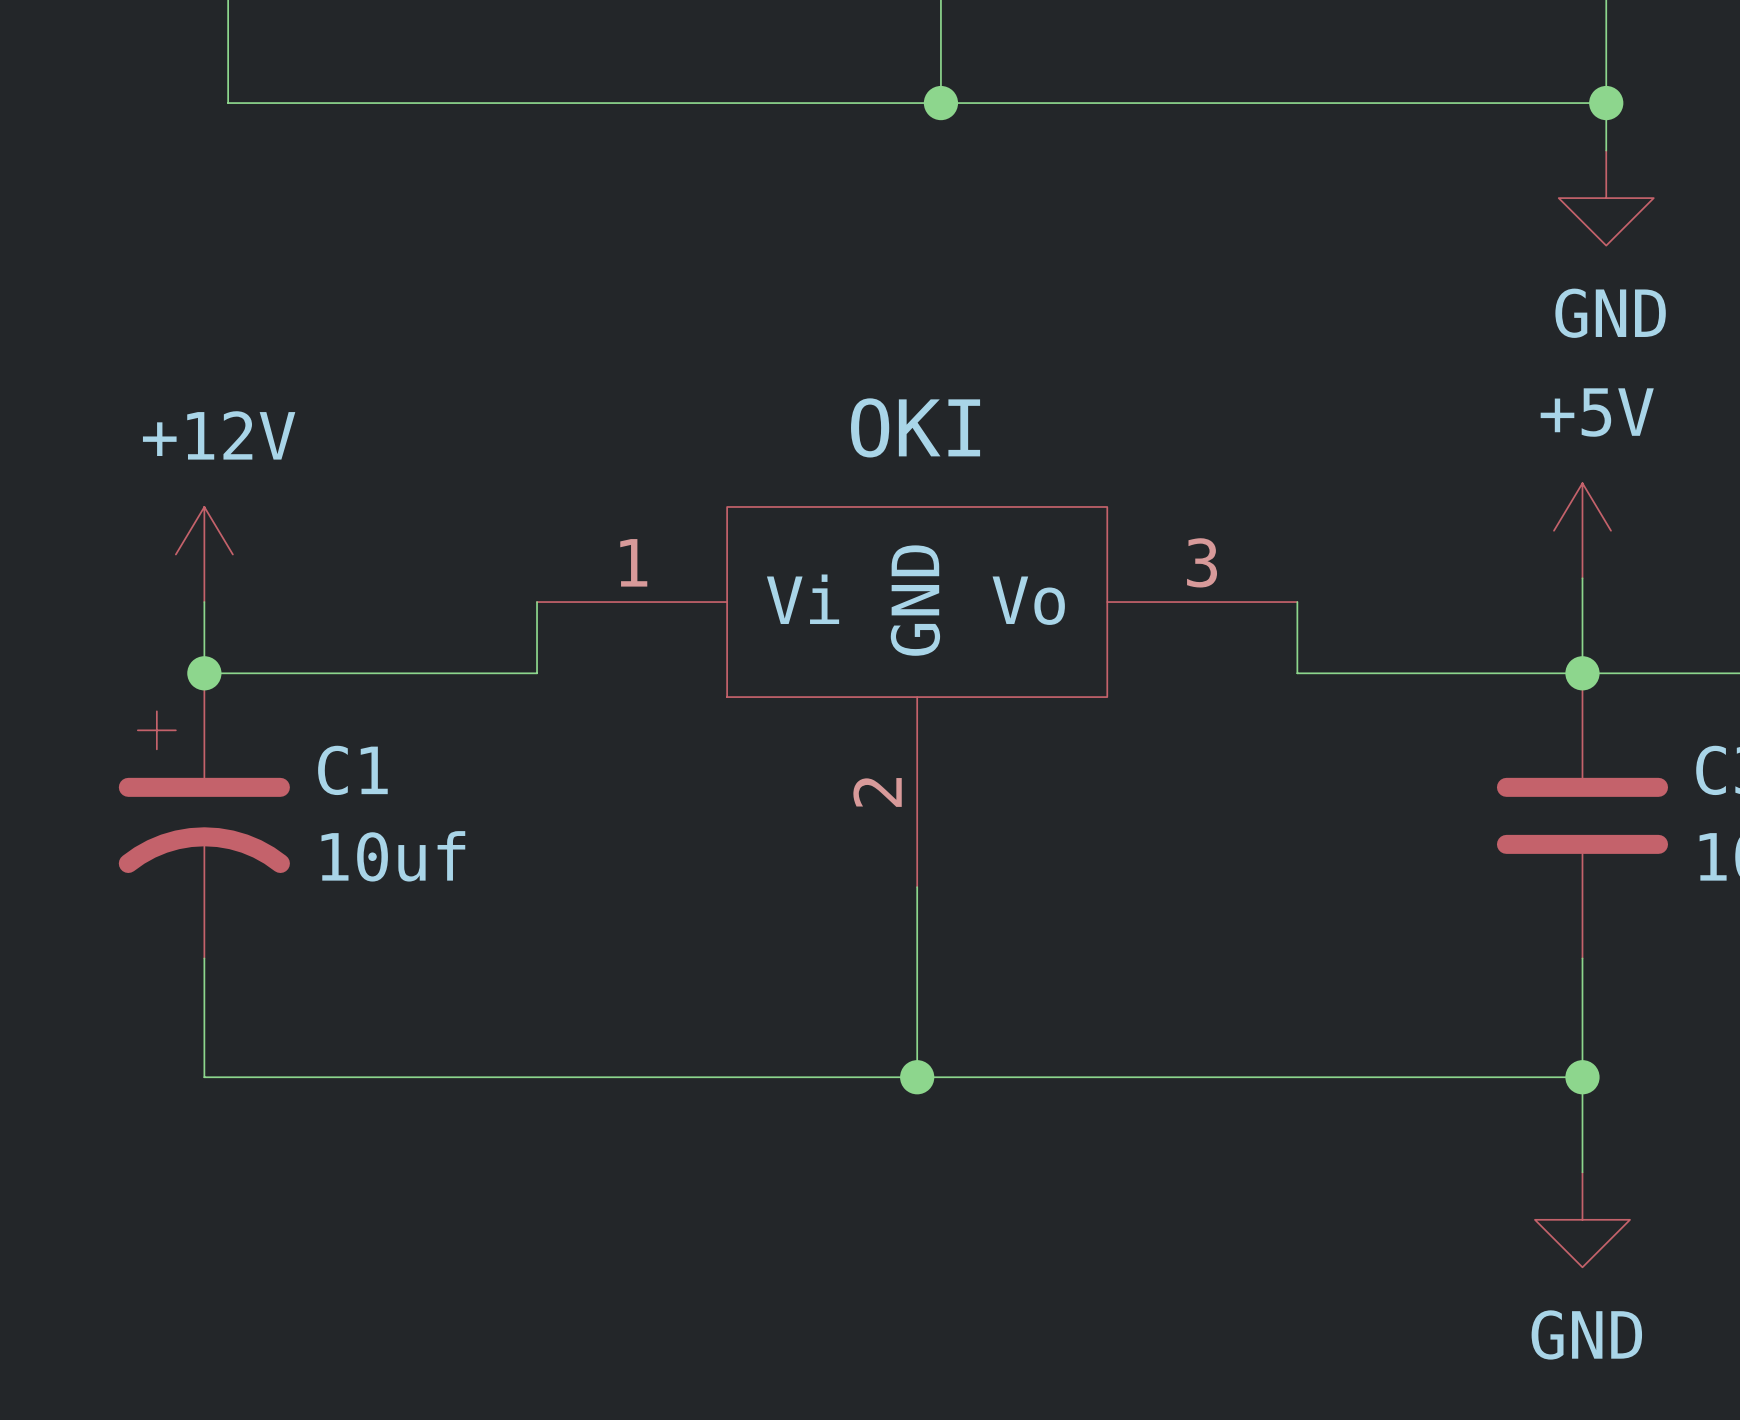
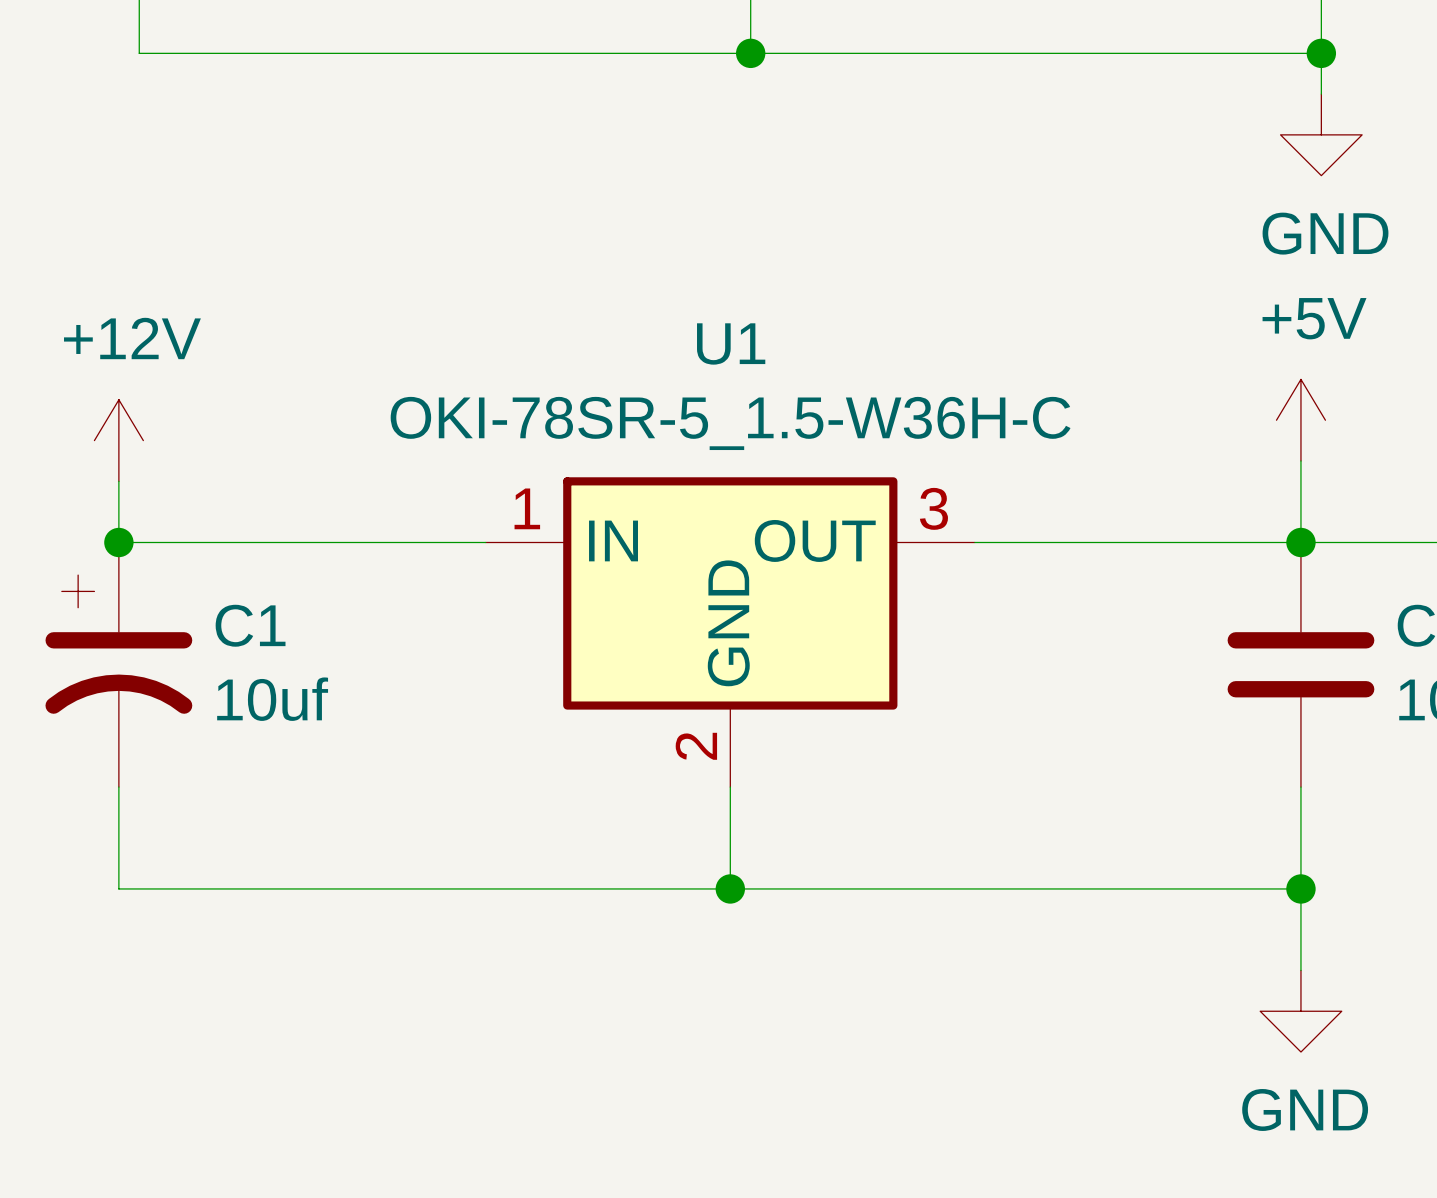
wire: (537, 602) (537, 673) -> (485, 542) (404, 542)
wire: (1297, 602) (1297, 673) -> (974, 542) (1056, 542)
part: OKI (917, 697) -> none
U1: none -> OKI-78SR-5_1.5-W36H-C (730, 632)

